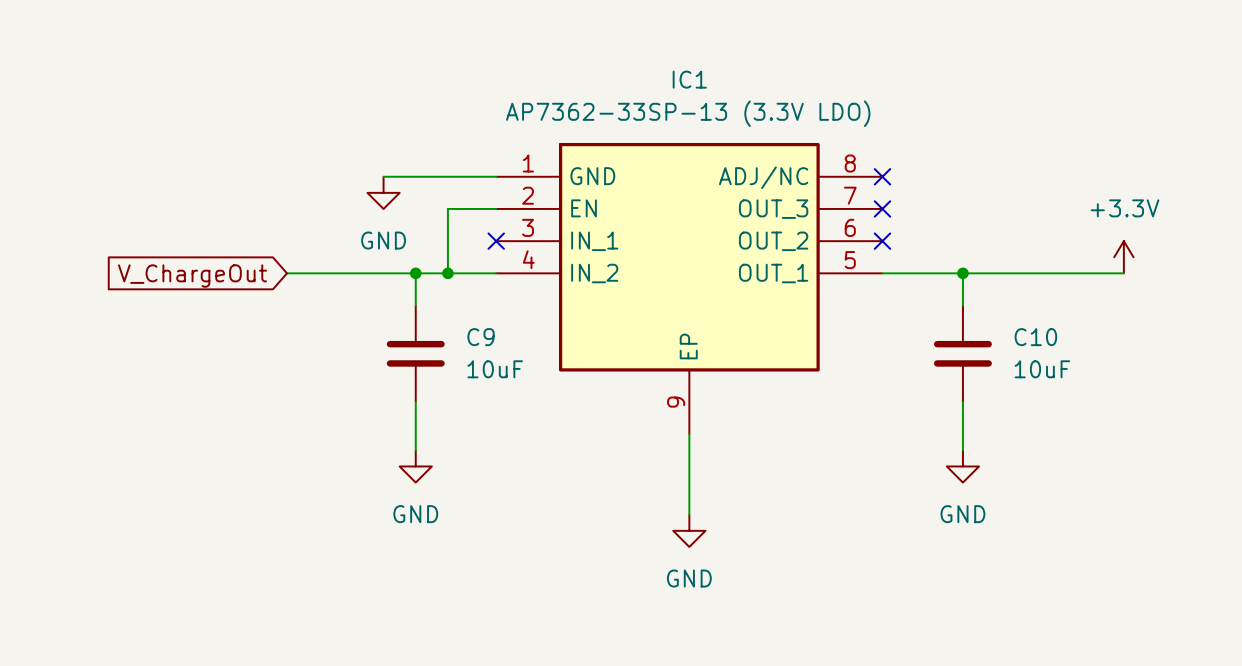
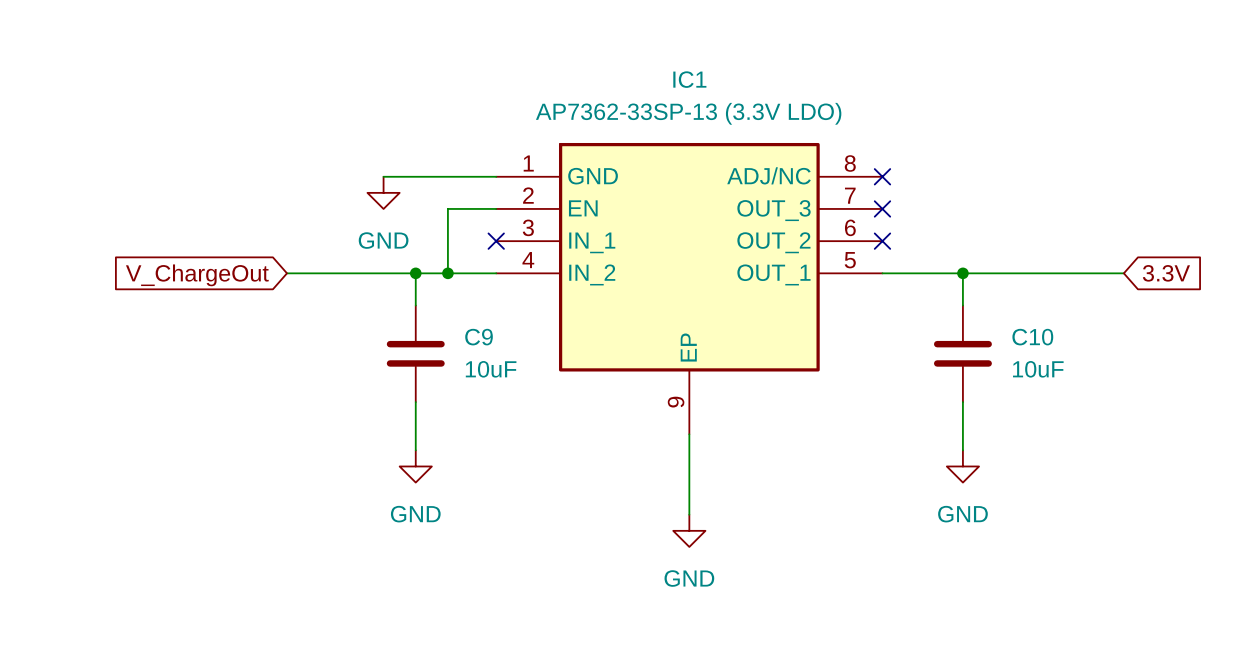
power symbol: +3.3V (1123, 257) -> none
global label: none -> 3.3V (1166, 273)

